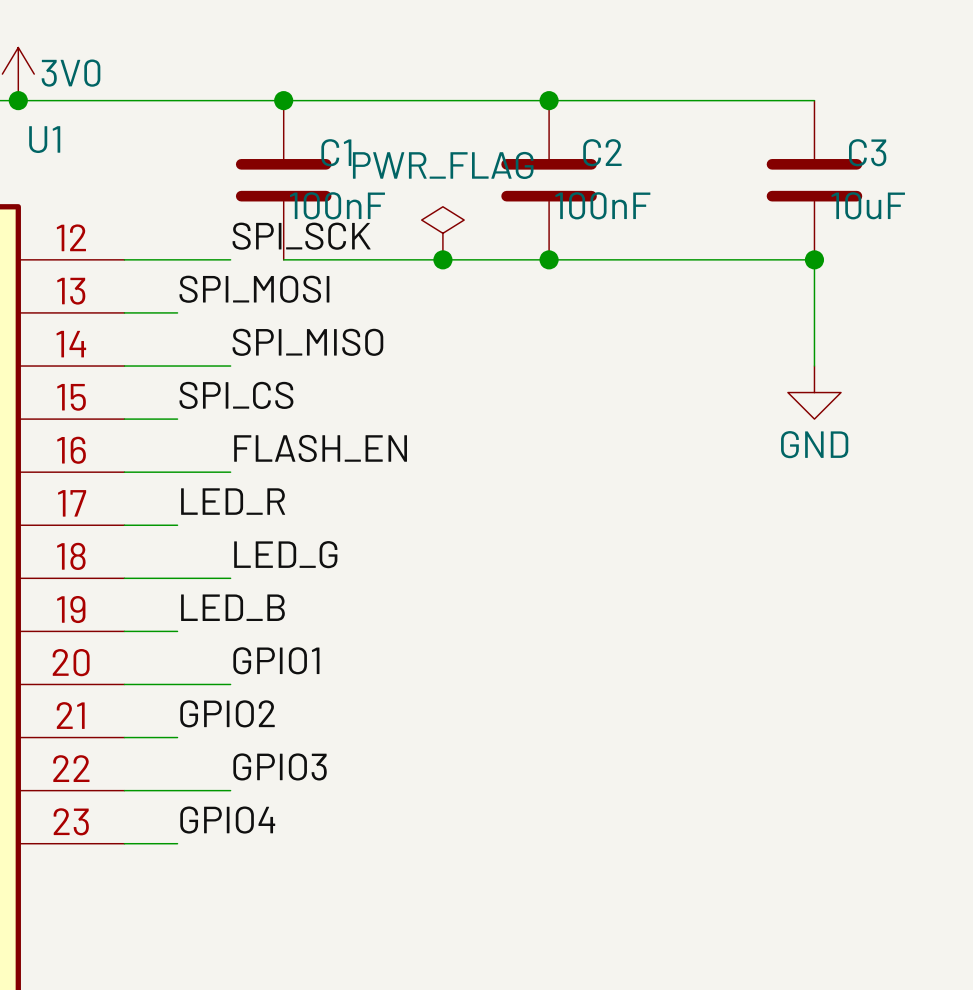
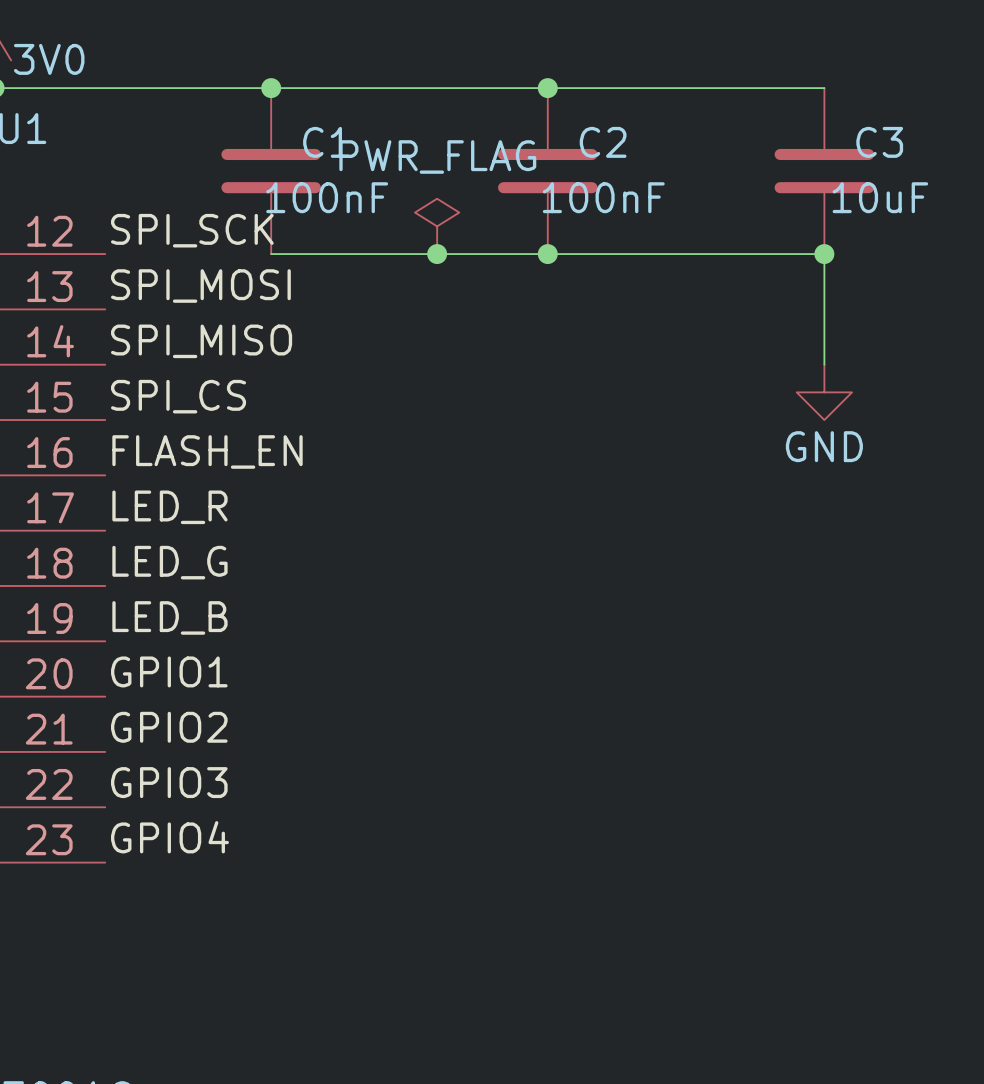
label position: SPI_SCK (301, 236) -> SPI_SCK (192, 230)
wire: (124, 259) (230, 259) -> none
label position: SPI_MOSI (254, 289) -> SPI_MOSI (200, 286)
wire: (124, 312) (177, 312) -> none
label position: SPI_MISO (307, 342) -> SPI_MISO (201, 341)
wire: (124, 366) (230, 366) -> none
label position: SPI_CS (236, 395) -> SPI_CS (178, 396)
wire: (124, 419) (177, 419) -> none
label position: FLASH_EN (320, 448) -> FLASH_EN (207, 451)
wire: (124, 472) (230, 472) -> none
label position: LED_R (233, 501) -> LED_R (169, 507)
wire: (124, 525) (177, 525) -> none
label position: LED_G (285, 554) -> LED_G (169, 562)
wire: (124, 578) (230, 578) -> none
label position: LED_B (232, 607) -> LED_B (169, 617)
wire: (124, 631) (177, 631) -> none
label position: GPIO1 (276, 660) -> GPIO1 (169, 671)
wire: (124, 684) (230, 684) -> none
label position: GPIO2 (227, 713) -> GPIO2 (169, 727)
wire: (124, 737) (177, 737) -> none
label position: GPIO3 (280, 766) -> GPIO3 (169, 782)
wire: (124, 790) (230, 790) -> none
label position: GPIO4 (227, 820) -> GPIO4 (169, 837)
wire: (124, 843) (177, 843) -> none

